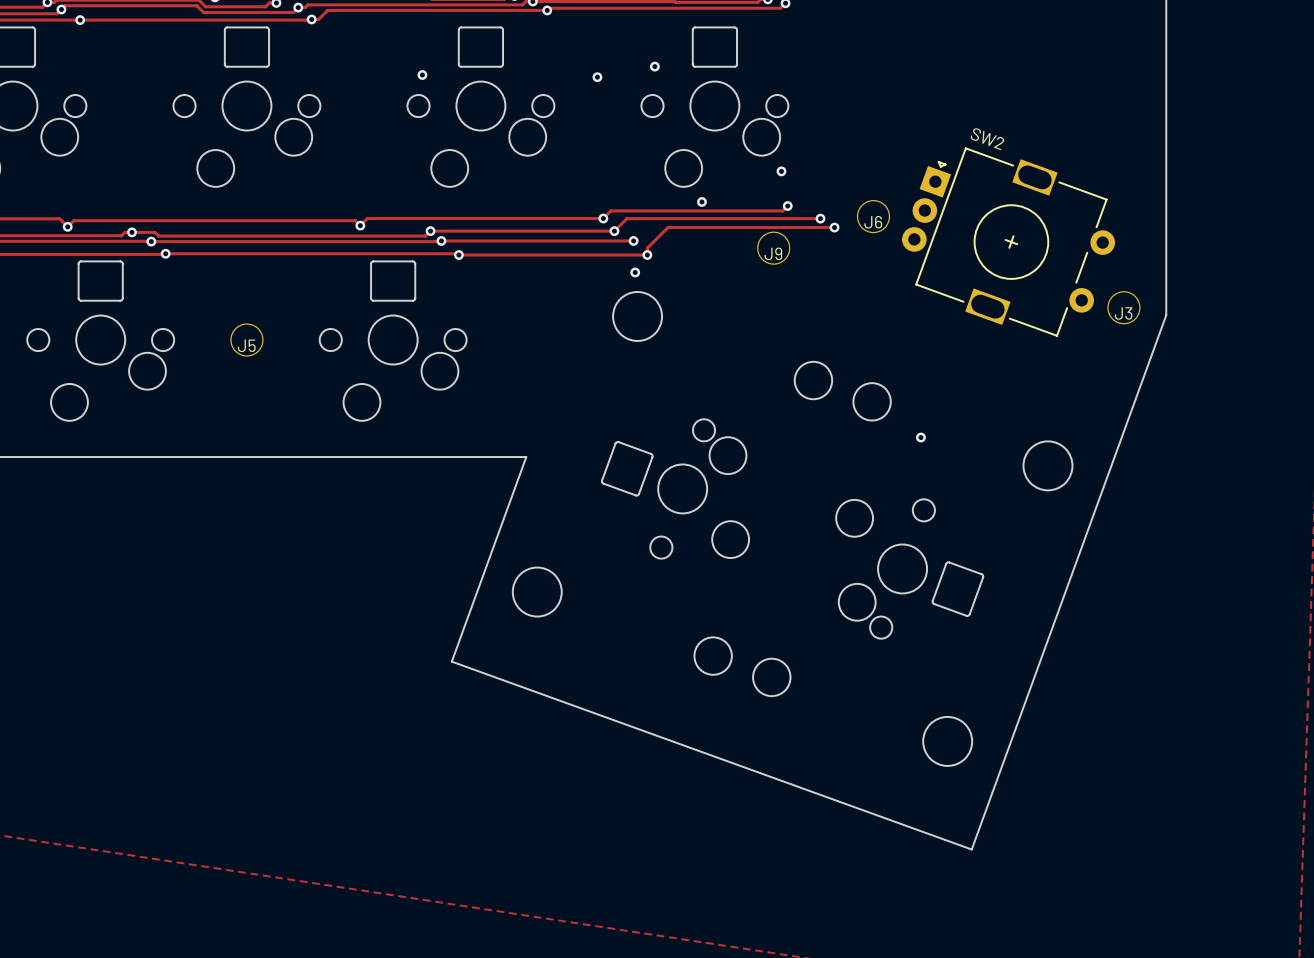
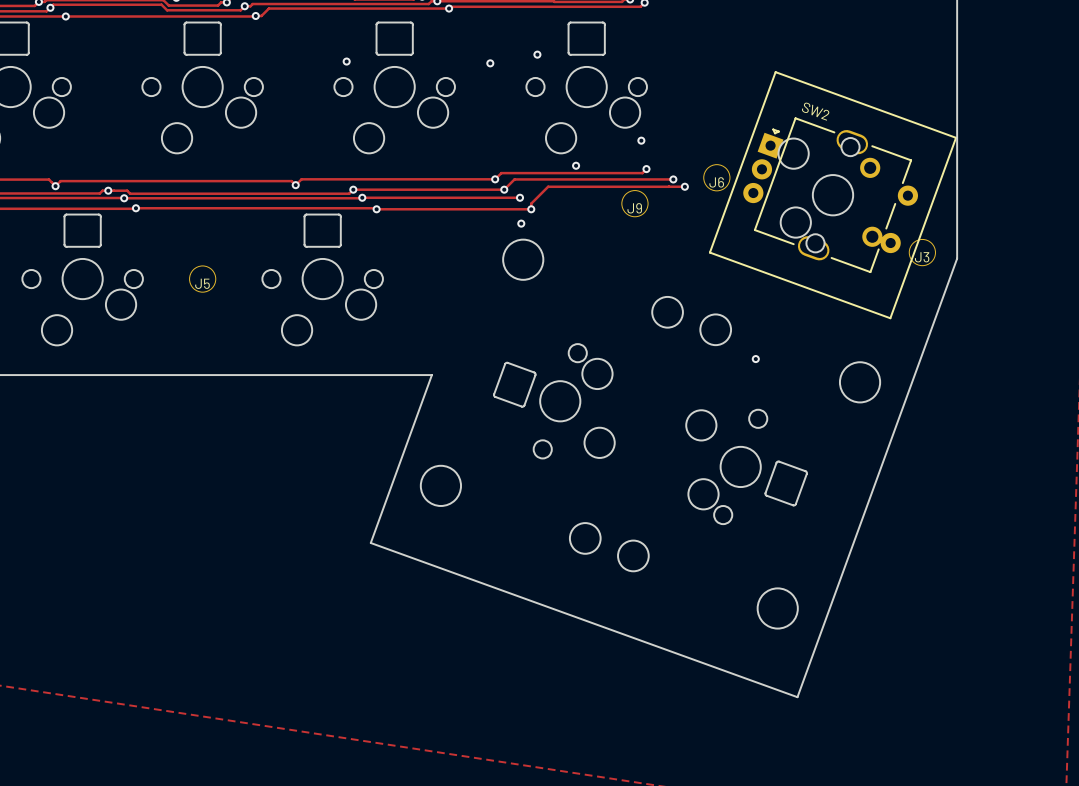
SW2 footprint: [902, 147, 1116, 337] -> [709, 71, 957, 320]

